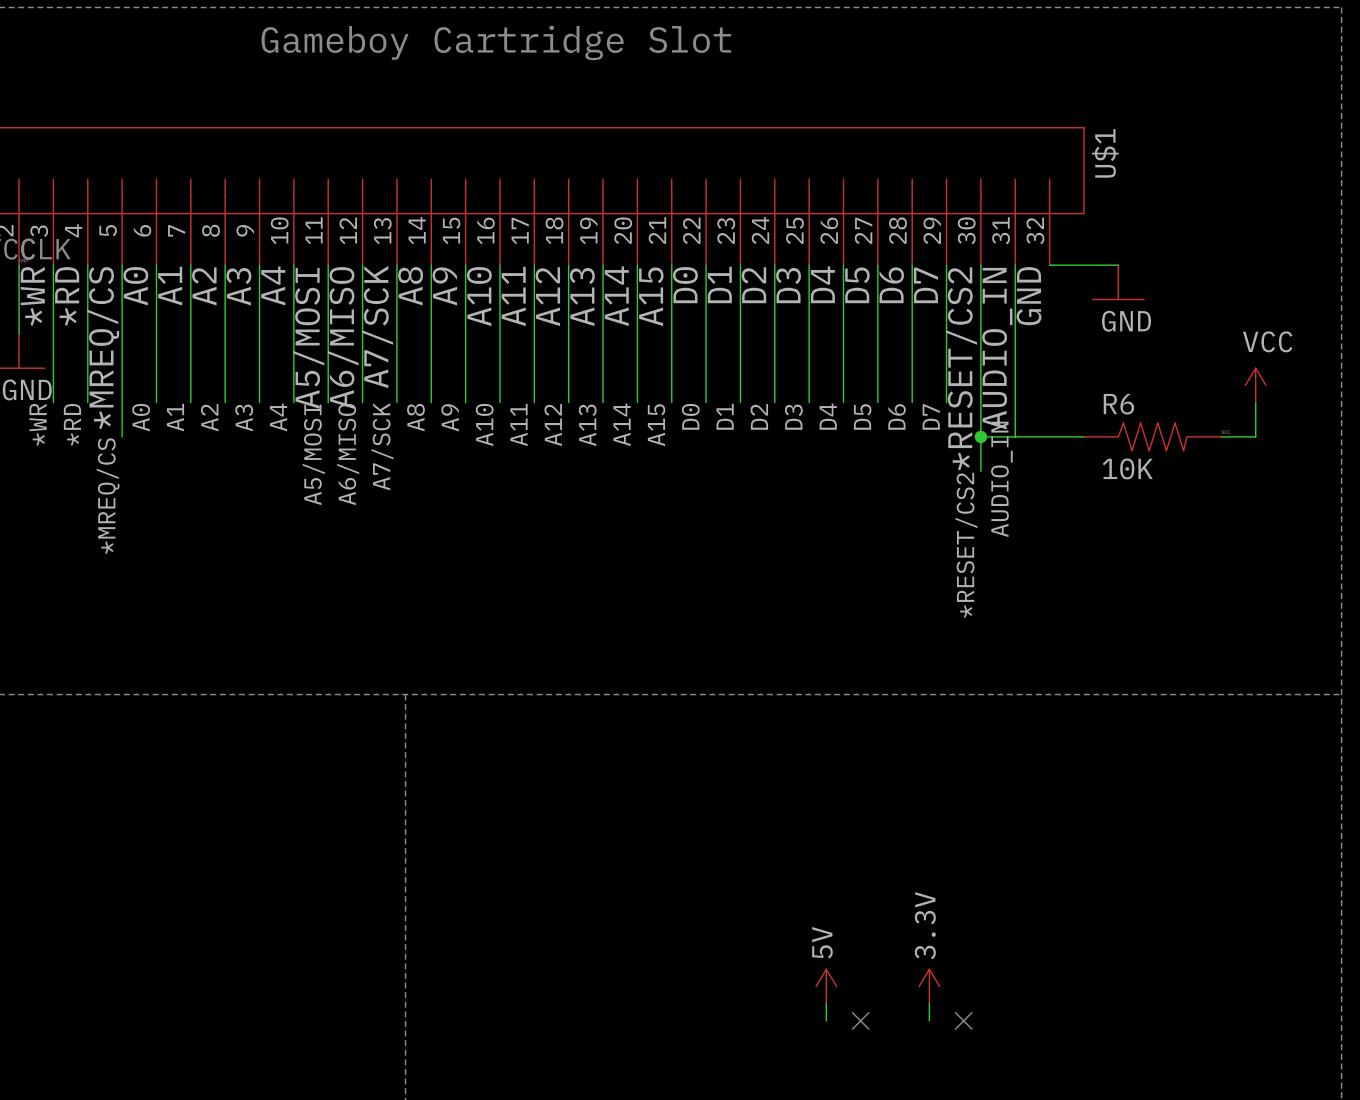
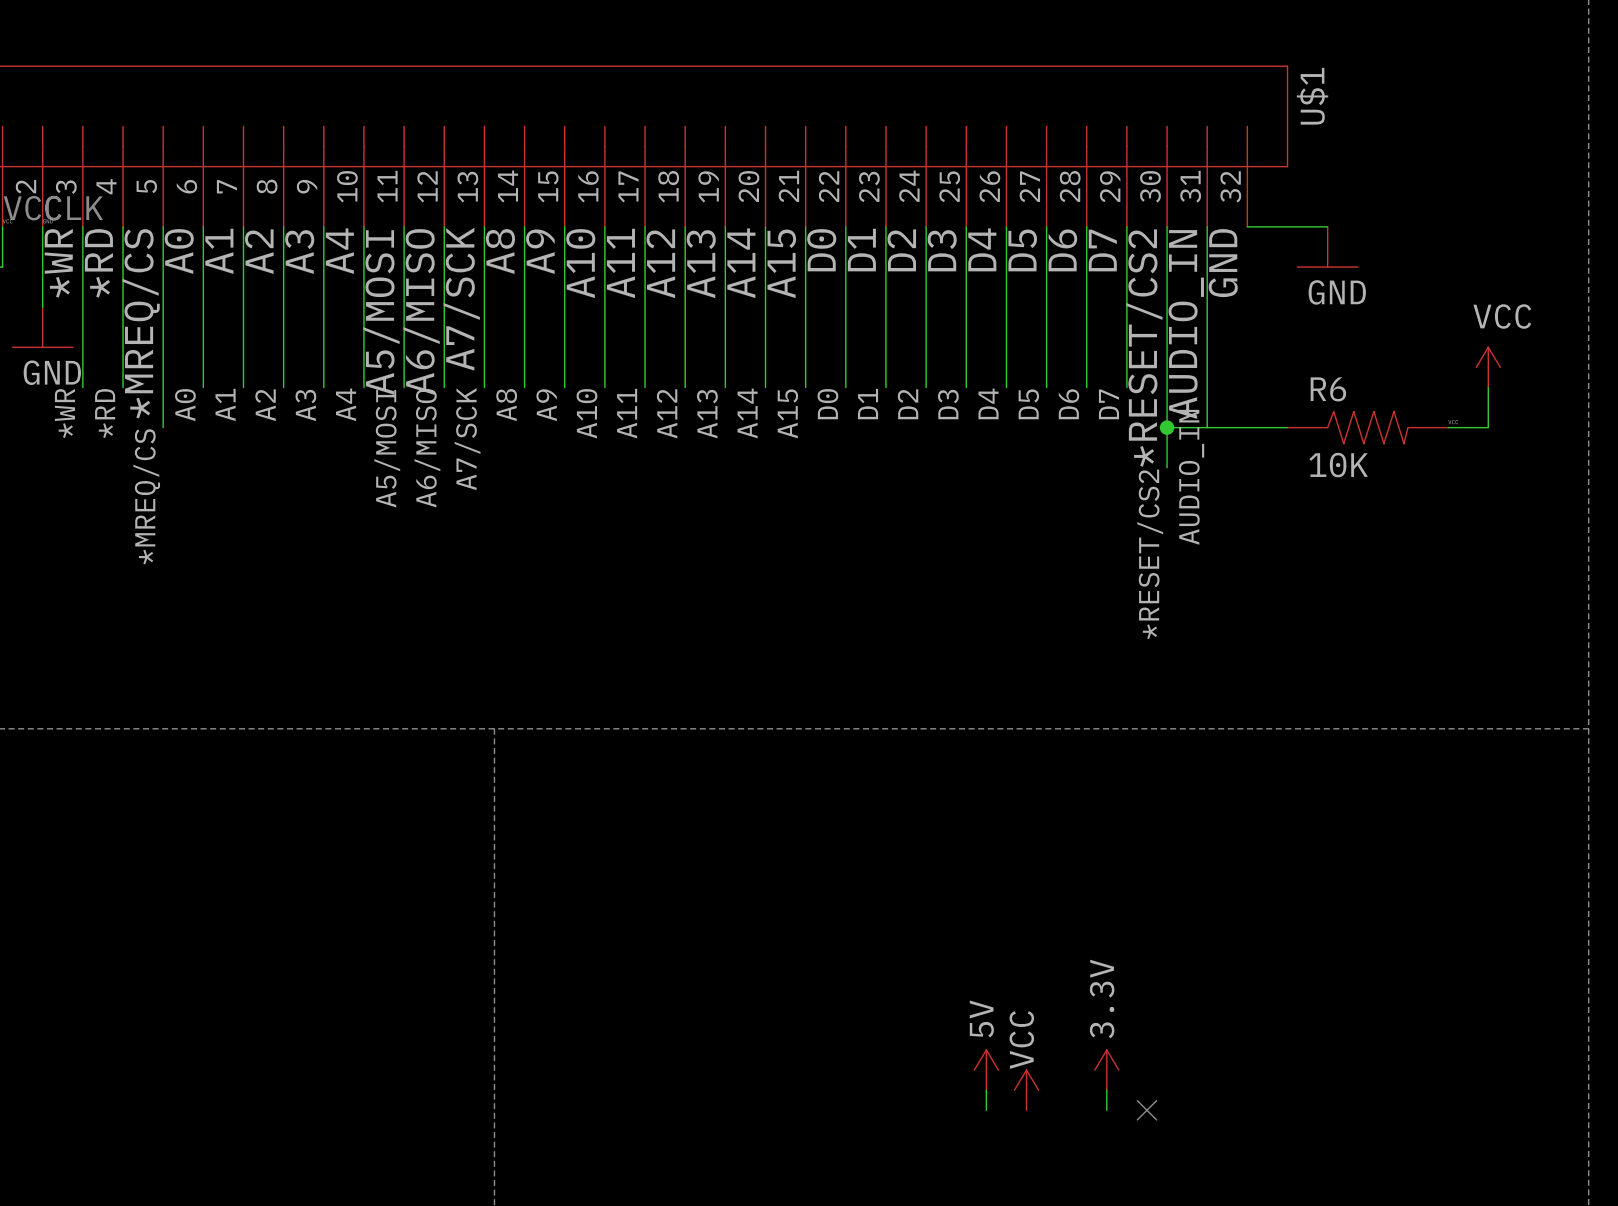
power symbol: none -> VCC (1026, 1090)
no-connect mark: (860, 1020) -> none

